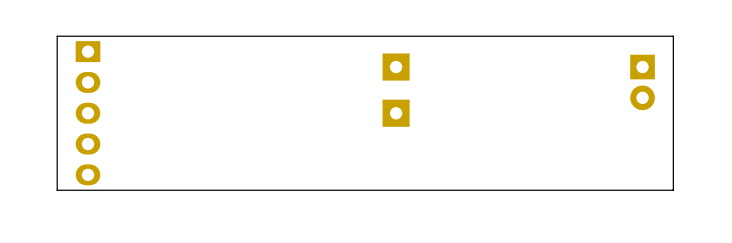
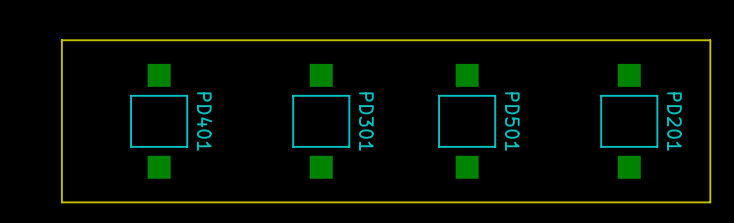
part: (396, 67) -> none
part: (642, 82) -> none
part: (88, 113) -> none
PD401: none -> (159, 121)
PD301: none -> (321, 121)
part: (396, 113) -> none
PD501: none -> (467, 121)
PD201: none -> (629, 121)

